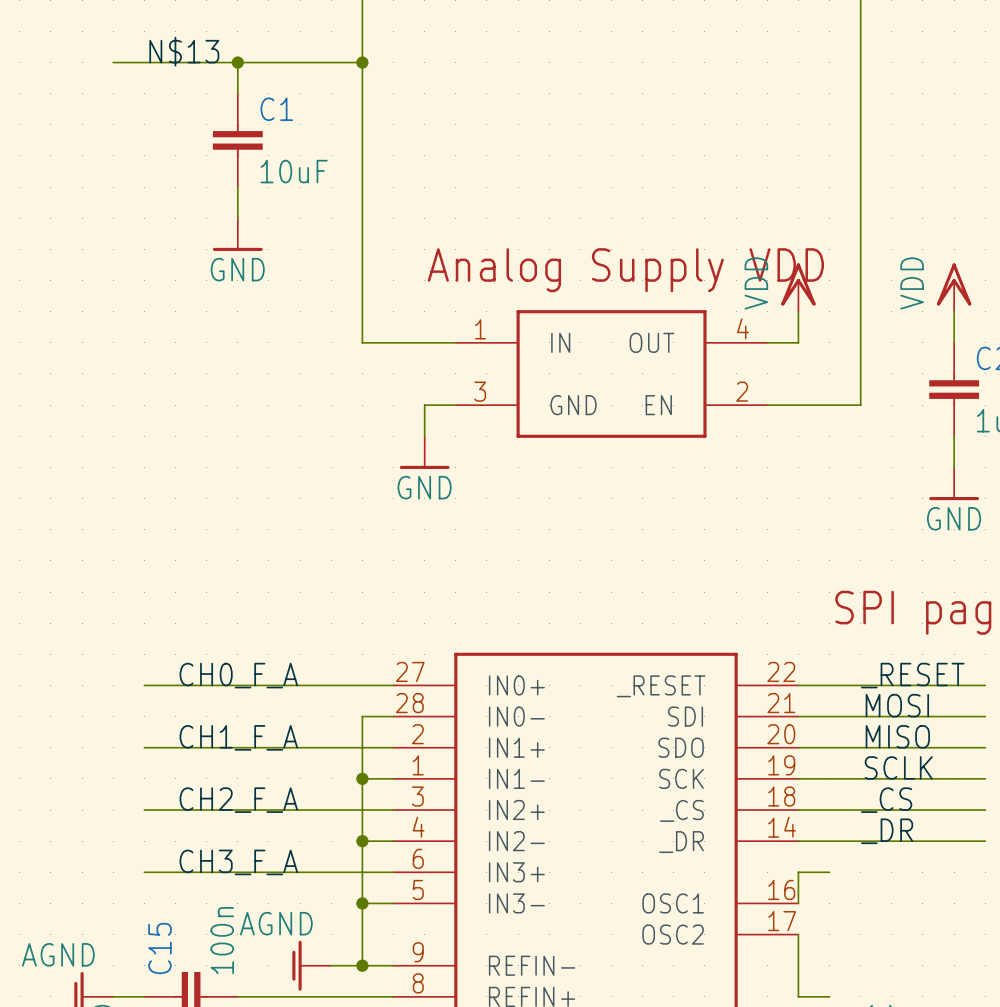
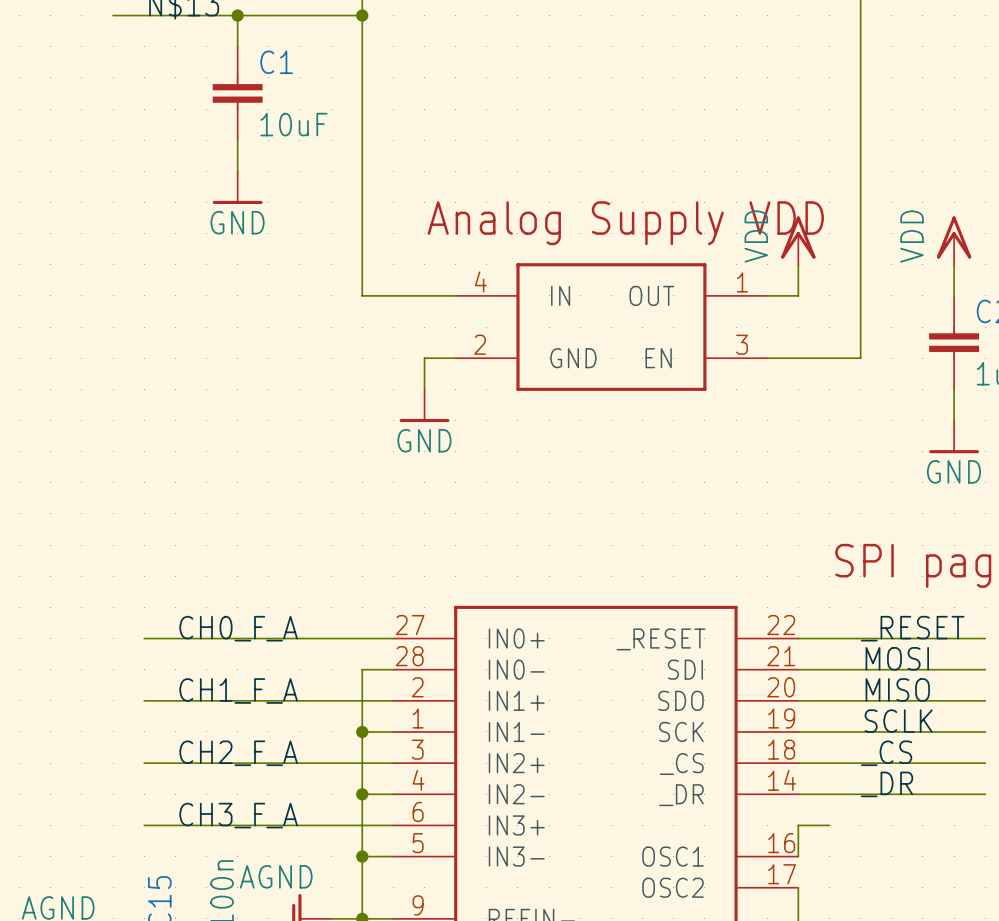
part pin number: 4 (742, 328) -> 1 (742, 282)
part pin number: 1 (480, 329) -> 4 (480, 281)
part pin number: 3 (480, 391) -> 2 (480, 344)
part pin number: 2 (742, 391) -> 3 (742, 344)

